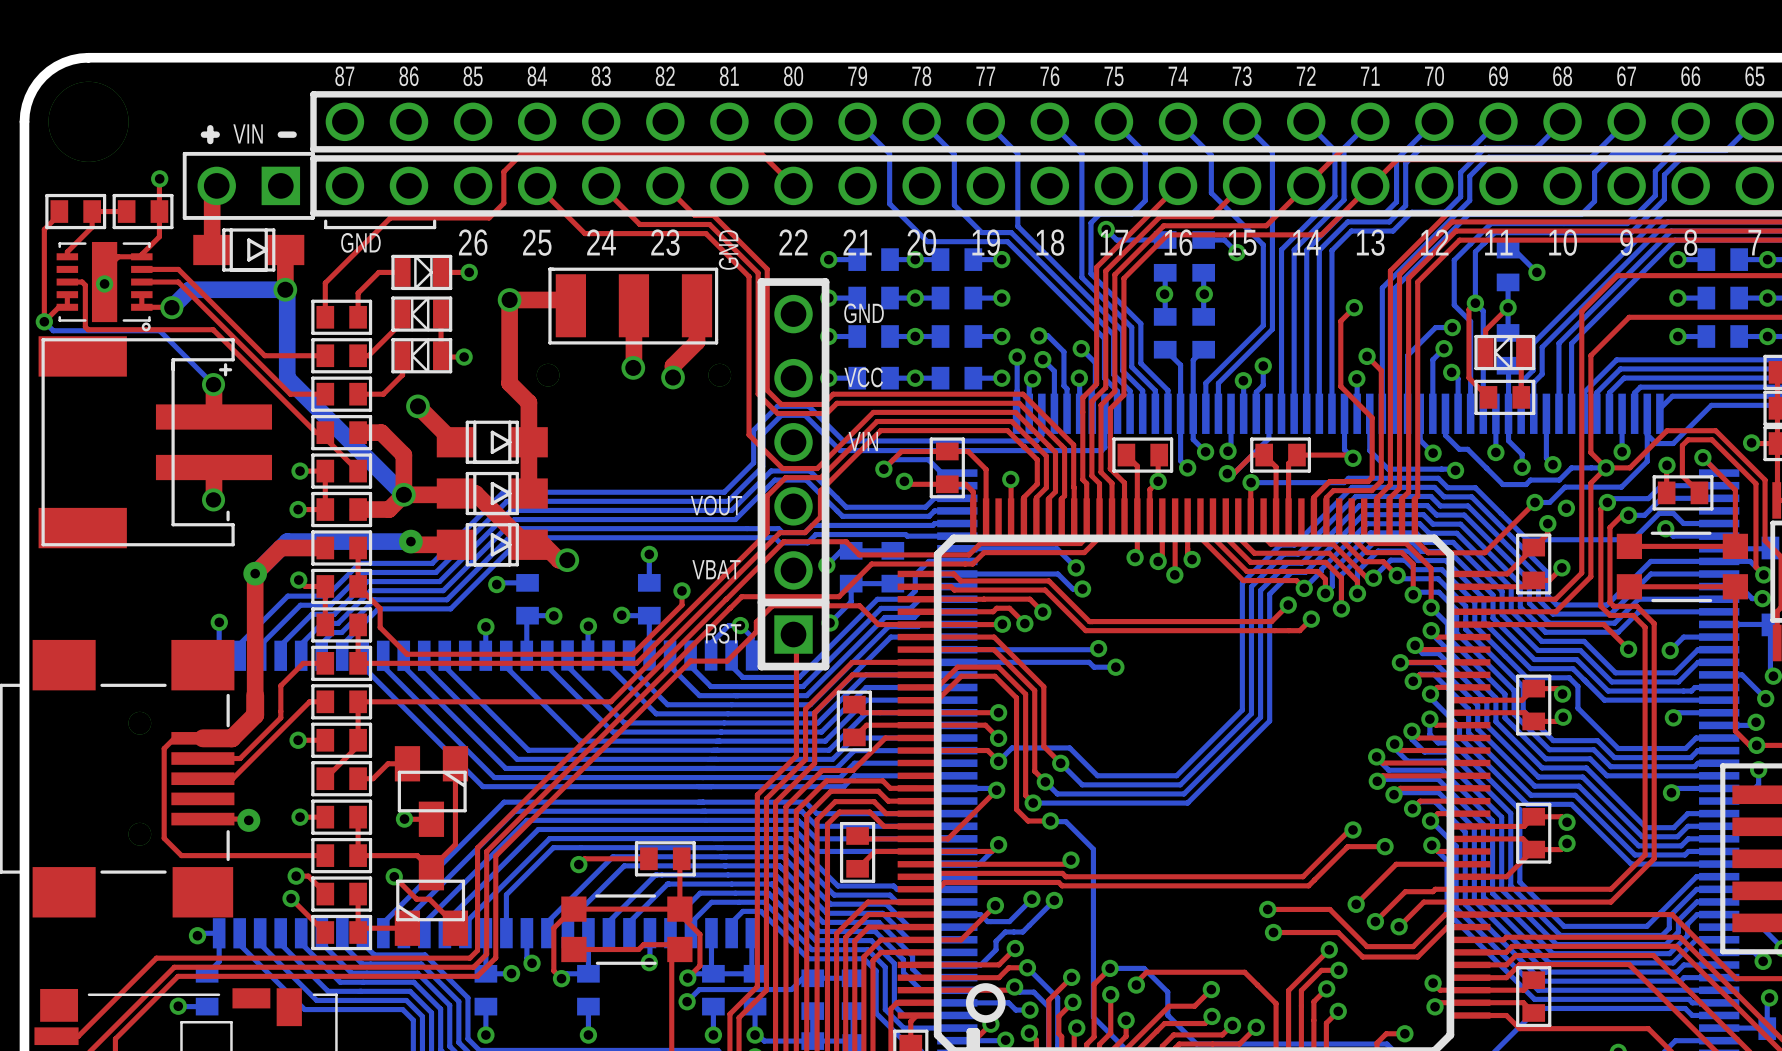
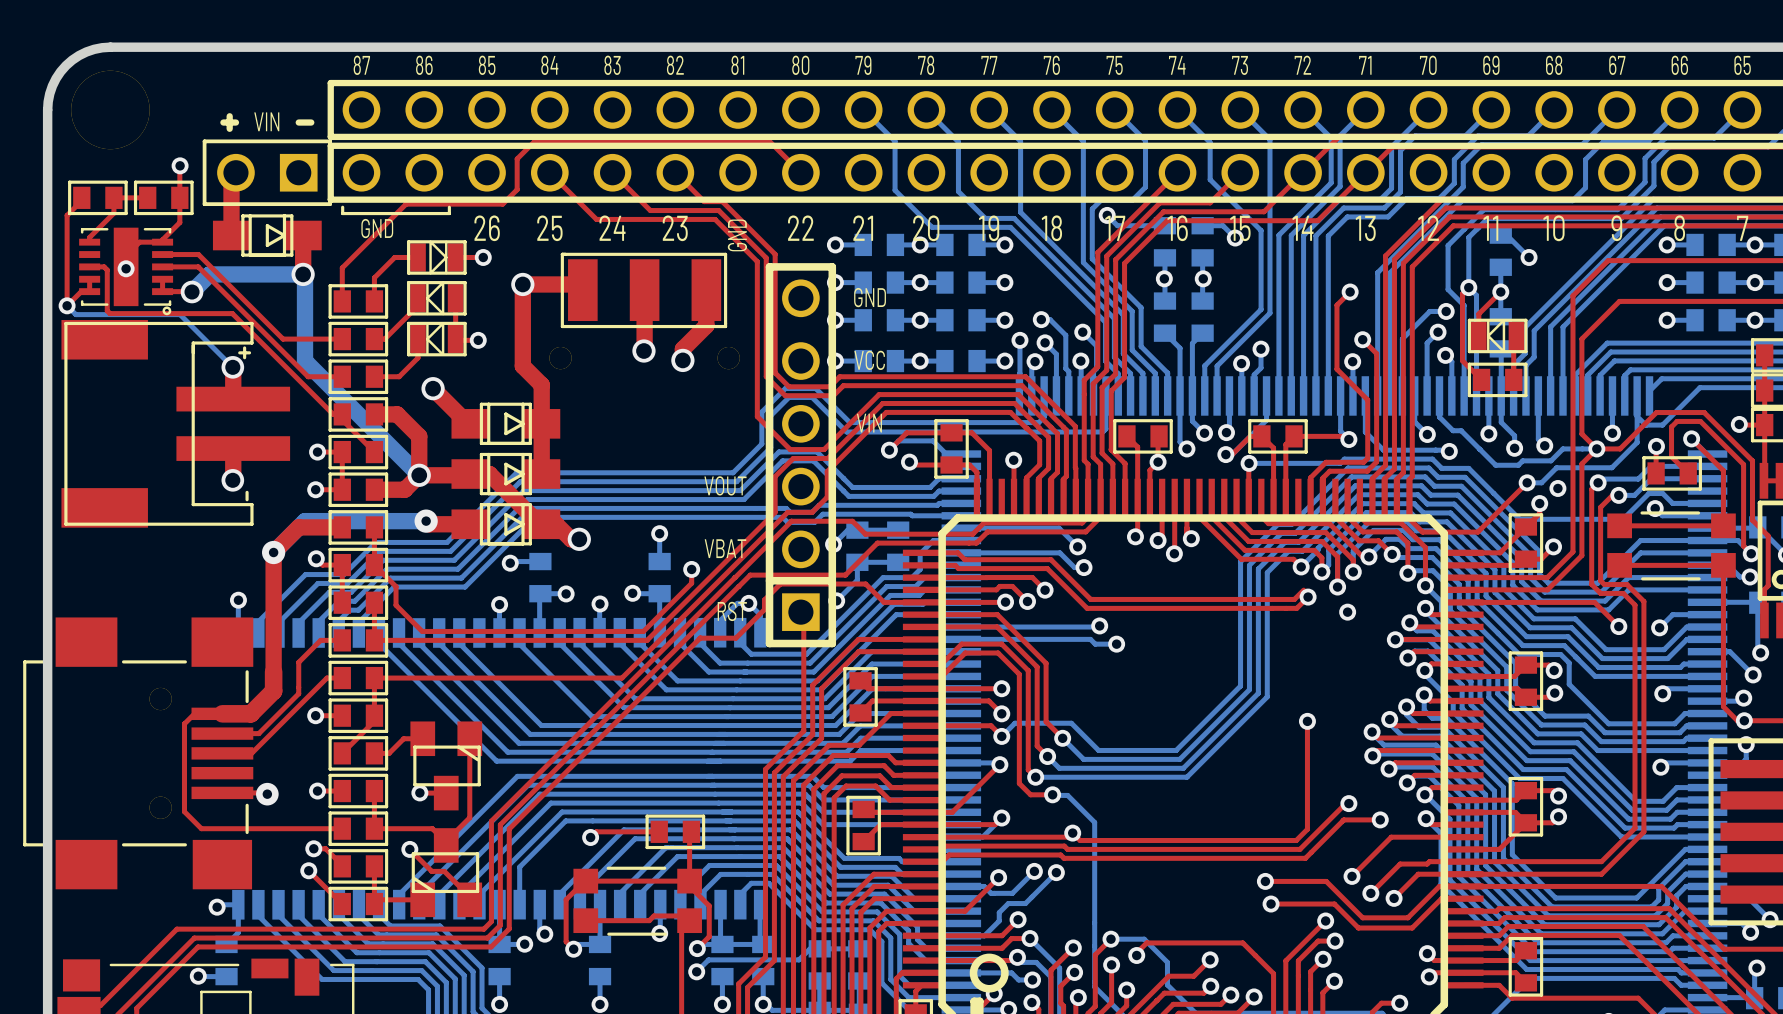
top track: (1288, 605) (1271, 621) -> (1303, 590) (1294, 599) (1269, 599)
via position: (1288, 605) -> (1347, 612)
top track: none -> (1307, 721) (1307, 829) (1296, 840) (1080, 840) (1072, 833)
via: none -> (1307, 721)

